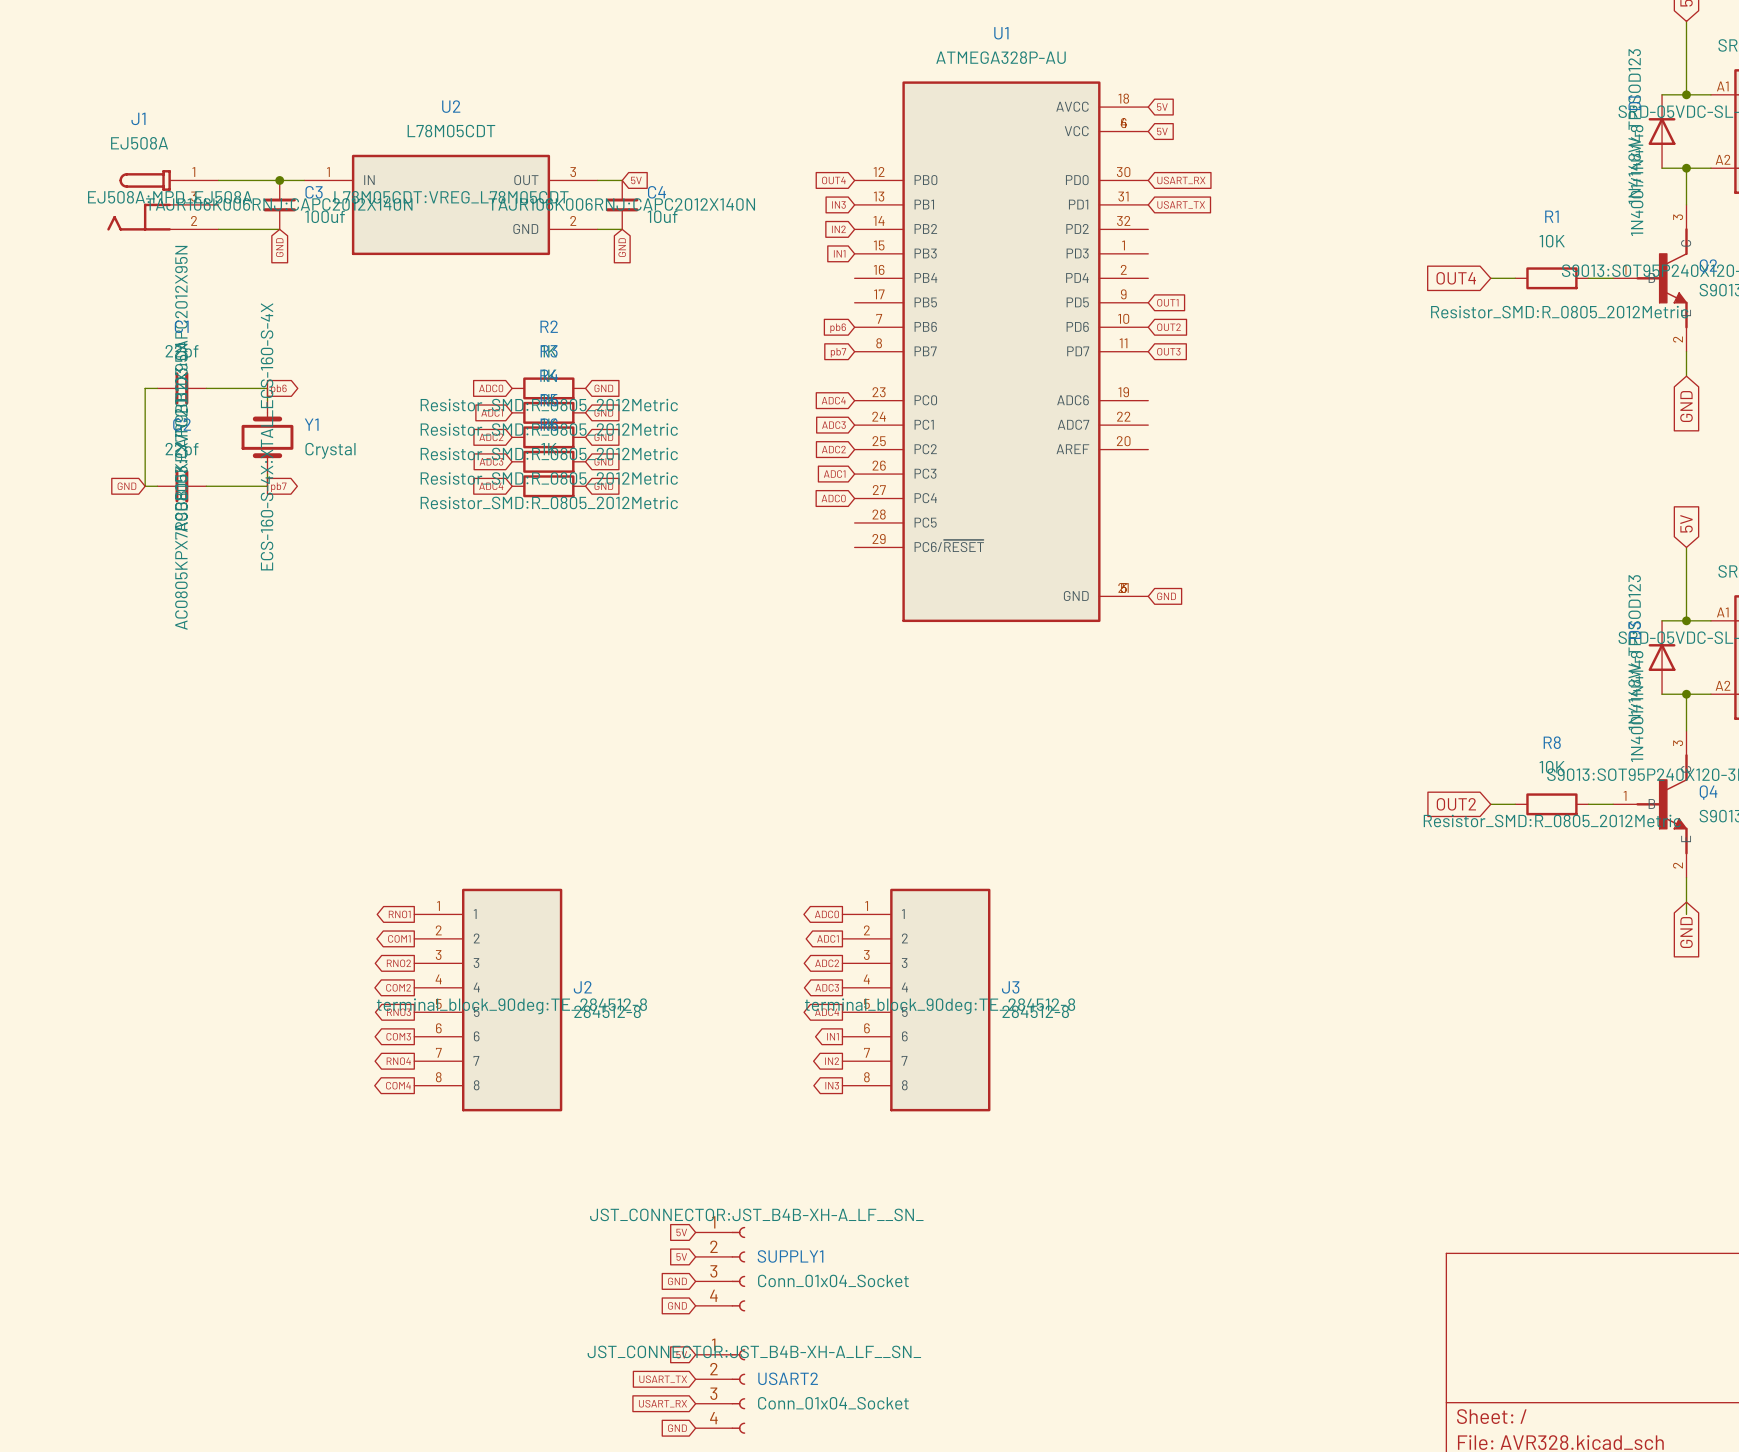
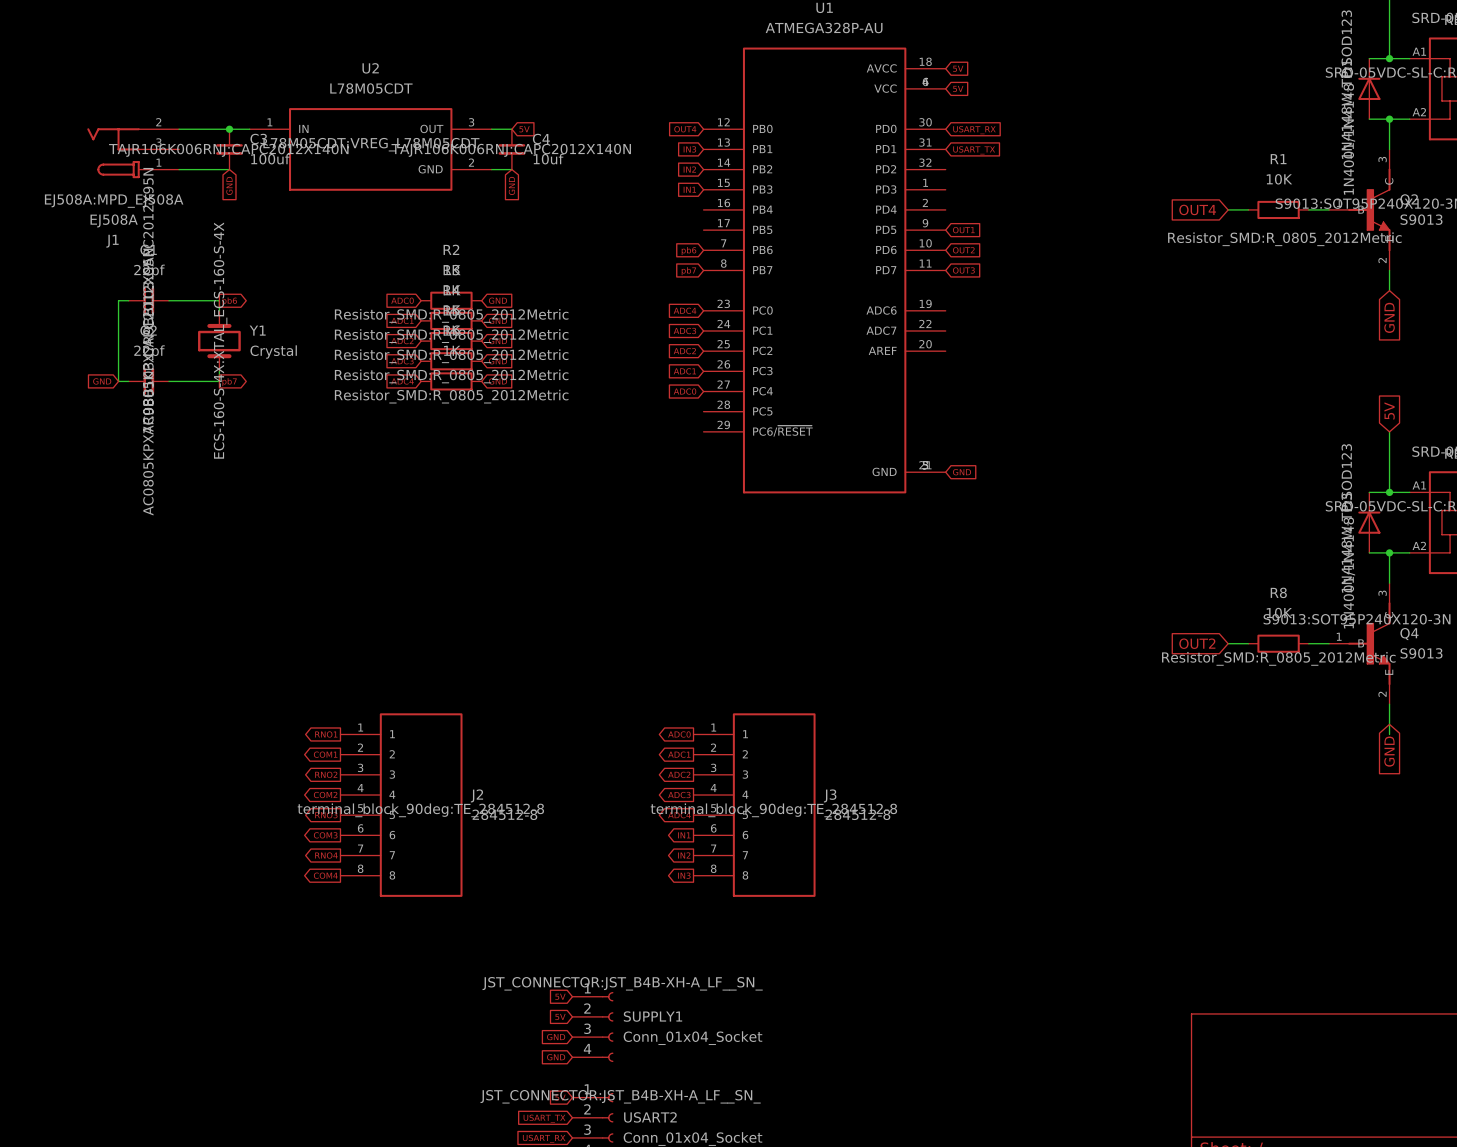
J1 name position: J1 (138, 118) -> J1 (112, 241)
J1 value position: EJ508A (139, 143) -> EJ508A (114, 220)
J1 text position: EJ508A:MPD_EJ508A (170, 197) -> EJ508A:MPD_EJ508A (114, 201)
J1 flip: as is (139, 200) -> up-down (113, 153)

